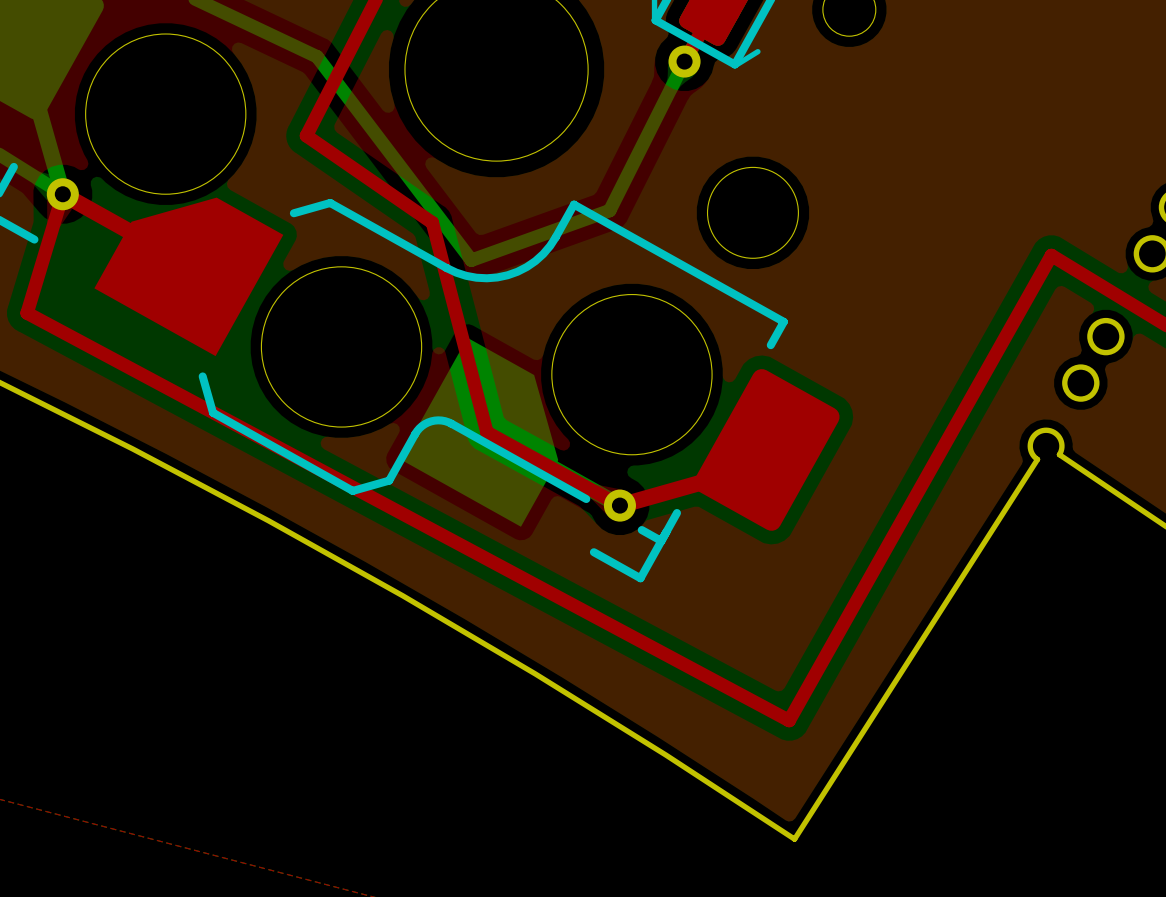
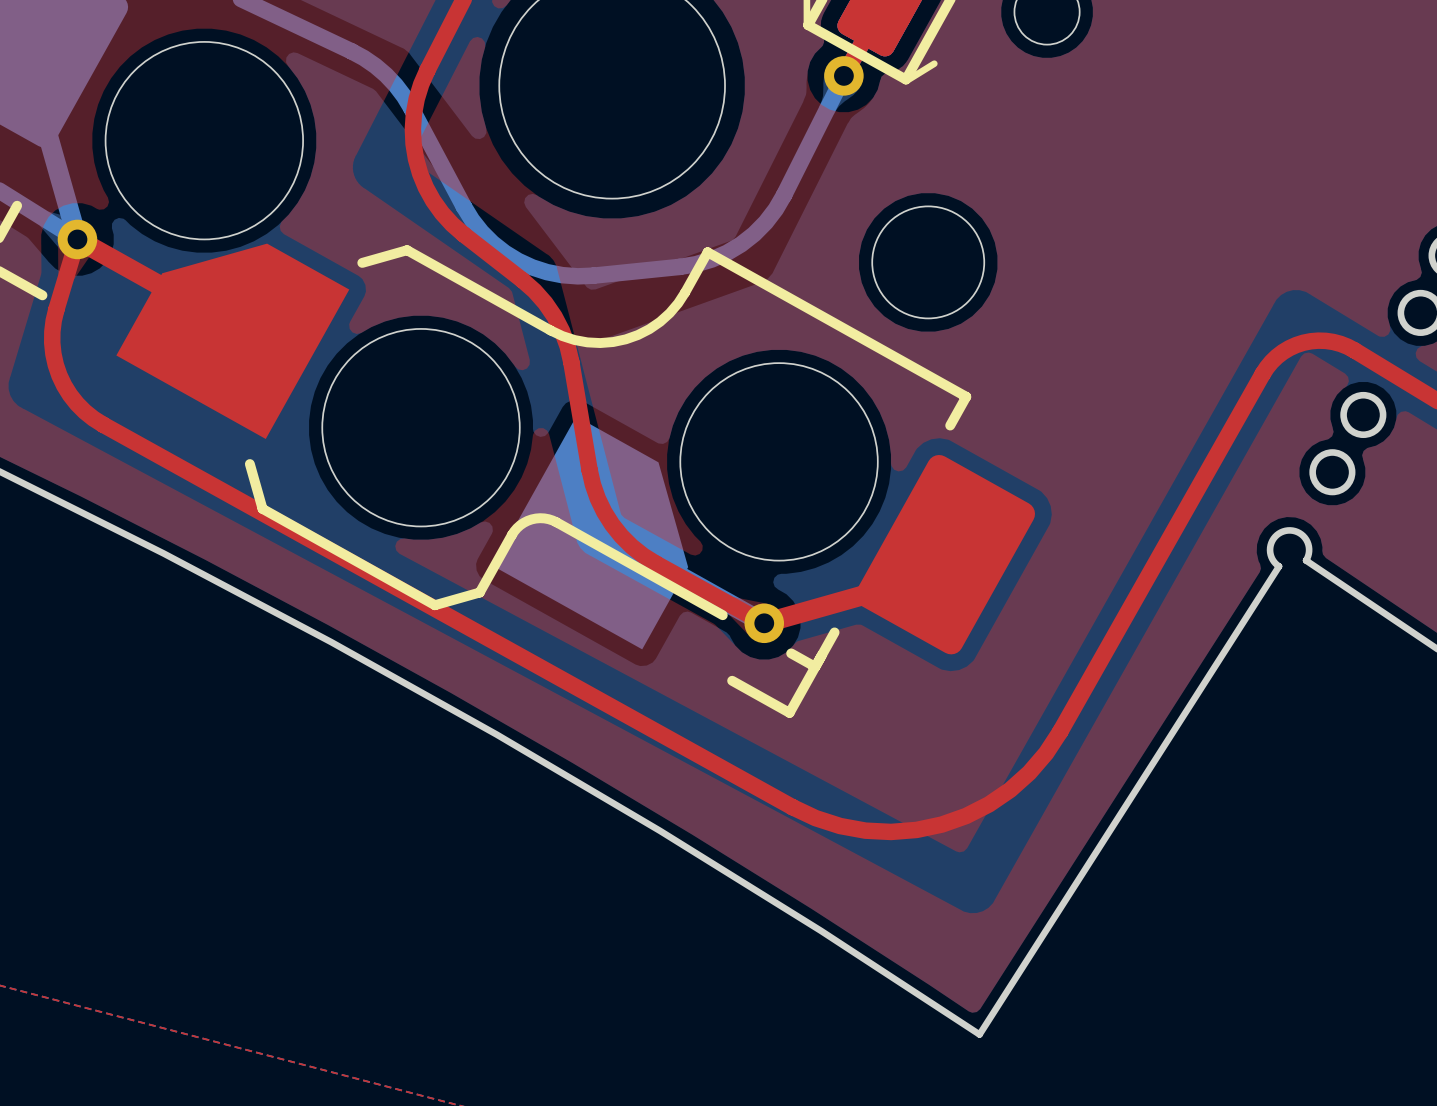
bottom track: (285, 41) (317, 56) (471, 260) (609, 210) (636, 158) -> (351, 51) (375, 65) (404, 96) (463, 206) (481, 232) (504, 252) (532, 267) (562, 275) (577, 276) (696, 264) (727, 252) (754, 234) (775, 209) (784, 194)
top track: (346, 57) (306, 135) (432, 222) (486, 432) (532, 457) -> (427, 70) (416, 98) (412, 128) (415, 158) (425, 187) (433, 200) (452, 224) (534, 290) (554, 316) (567, 346) (589, 470) (597, 498) (612, 524) (621, 536) (631, 546) (655, 563)
top track: (45, 251) (27, 313) (789, 720) (1051, 255) (1098, 284) -> (56, 309) (52, 342) (59, 375) (76, 403) (102, 424) (792, 807) (815, 818) (840, 826) (865, 830) (891, 831) (916, 829) (941, 824) (966, 816) (988, 804) (1010, 789) (1029, 772) (1046, 753) (1060, 731) (1266, 367) (1282, 352) (1296, 345) (1310, 341) (1333, 341) (1354, 350)

